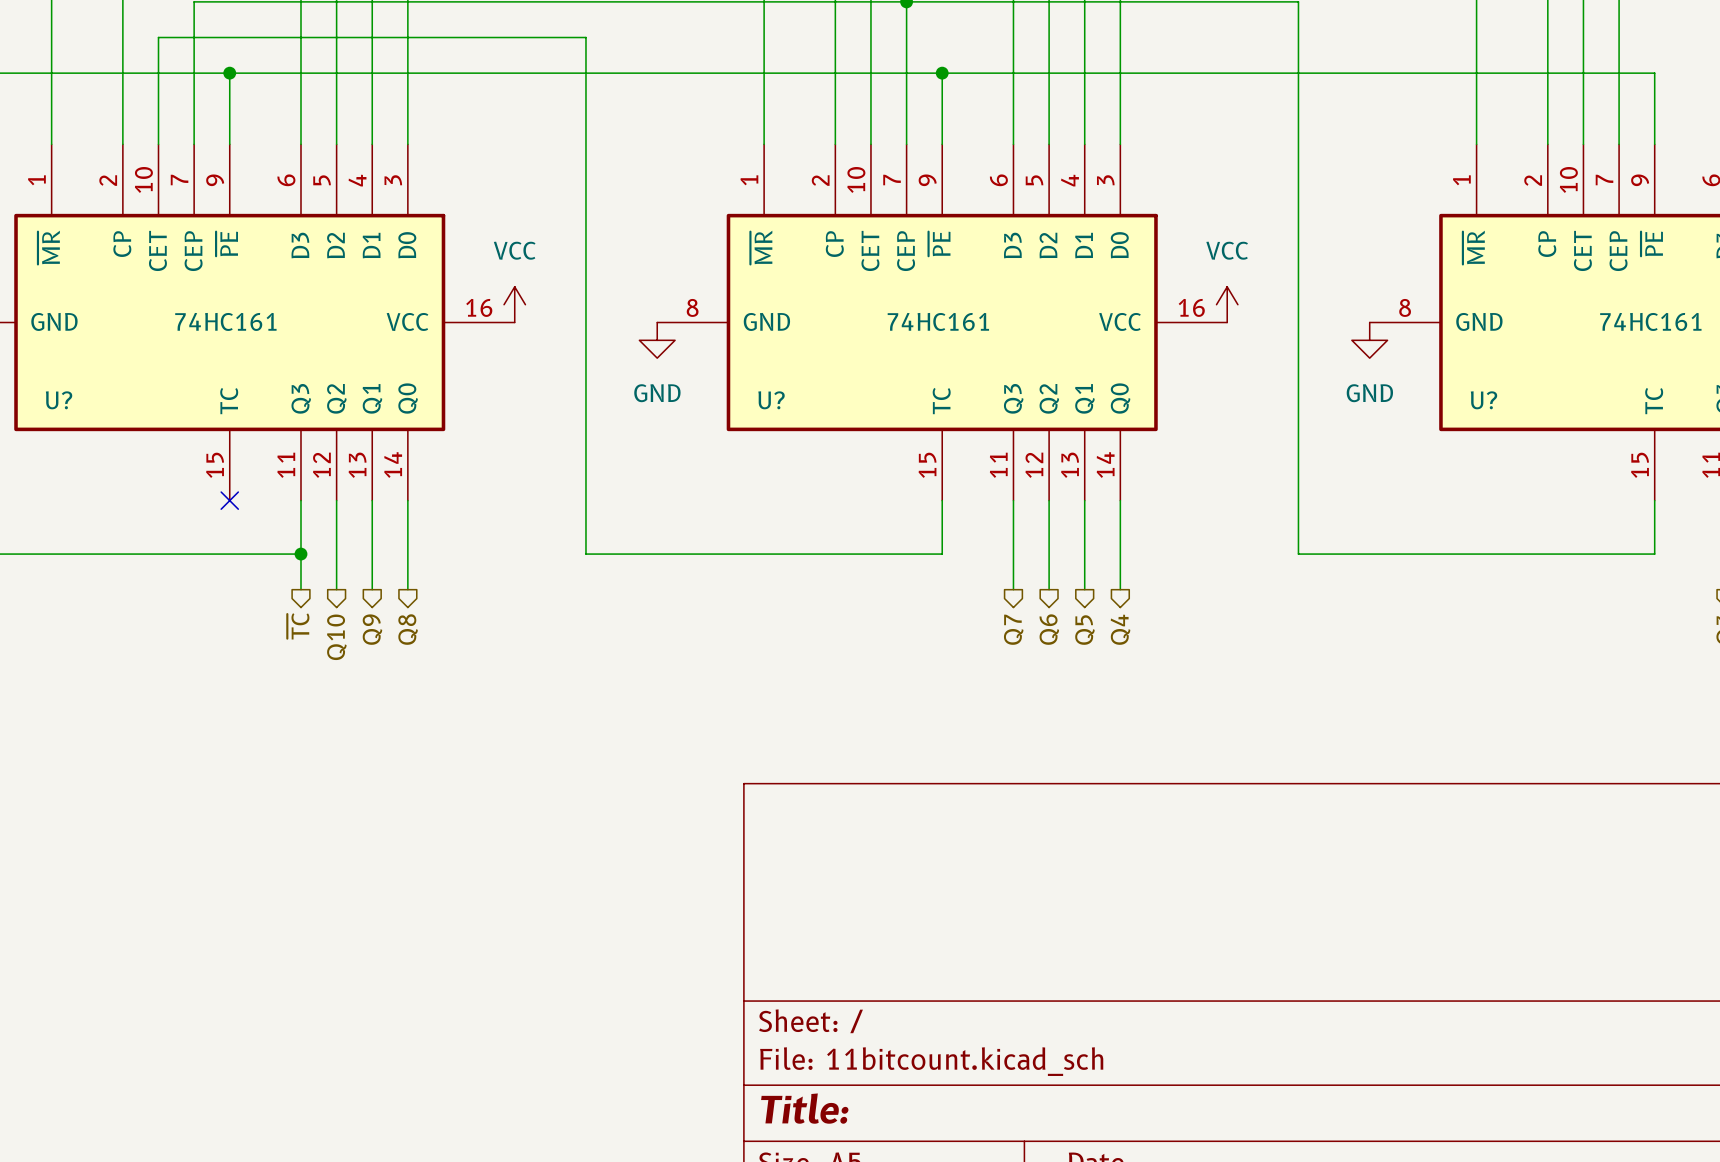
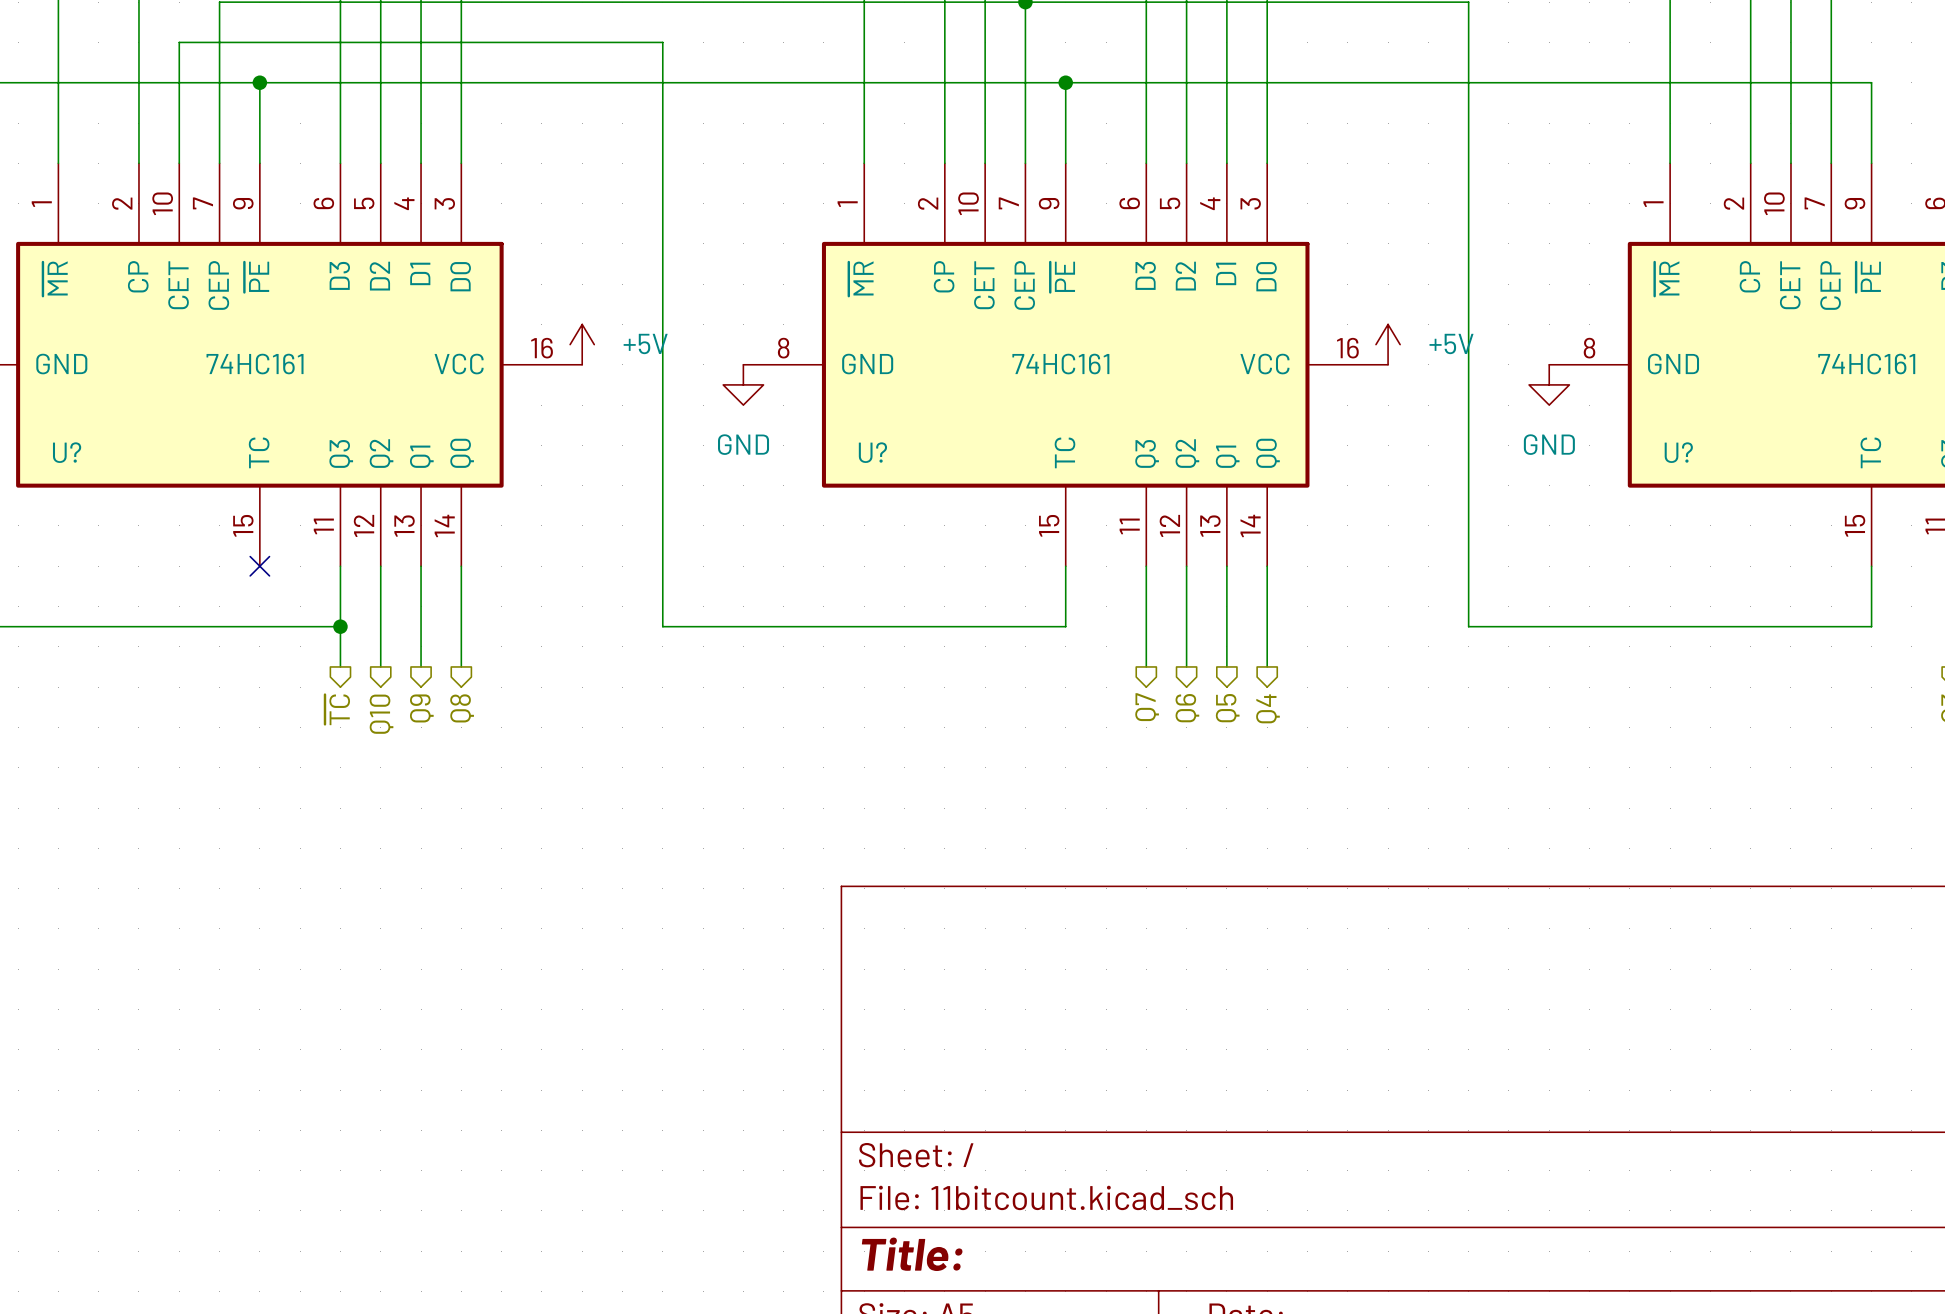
power symbol: VCC (514, 304) -> +5V (582, 344)
power symbol: VCC (1227, 304) -> +5V (1388, 344)

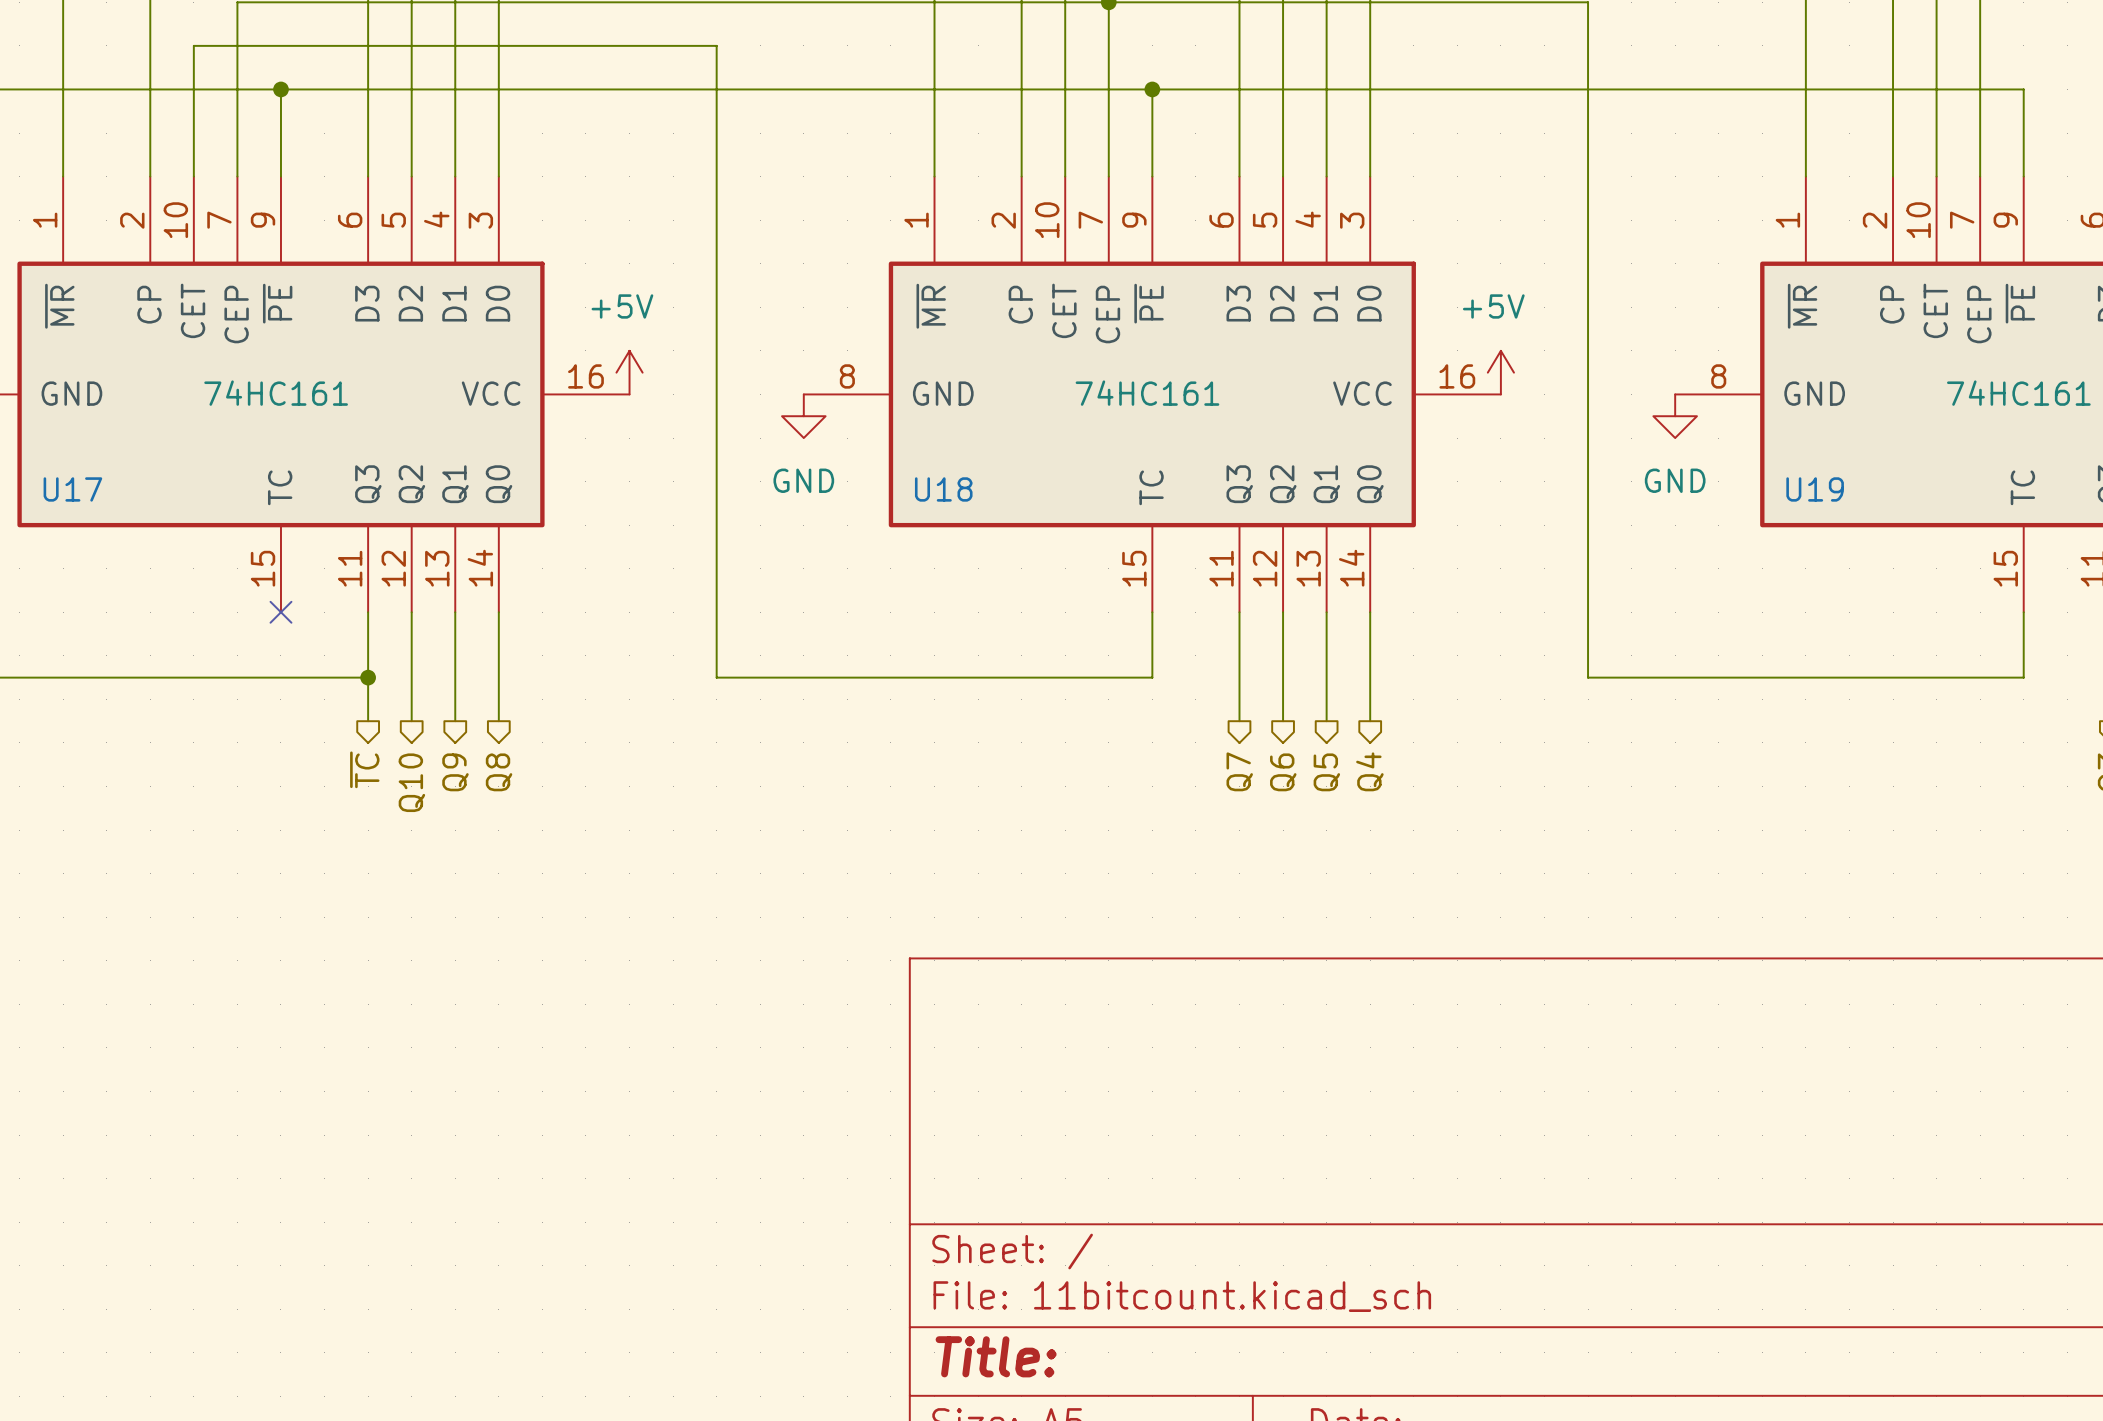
power symbol text position: +5V (645, 343) -> +5V (622, 306)
power symbol text position: +5V (1451, 343) -> +5V (1493, 306)
U? name: U? (67, 452) -> U17 (72, 489)
U? name: U? (872, 452) -> U18 (943, 489)
U? name: U? (1678, 452) -> U19 (1815, 489)

